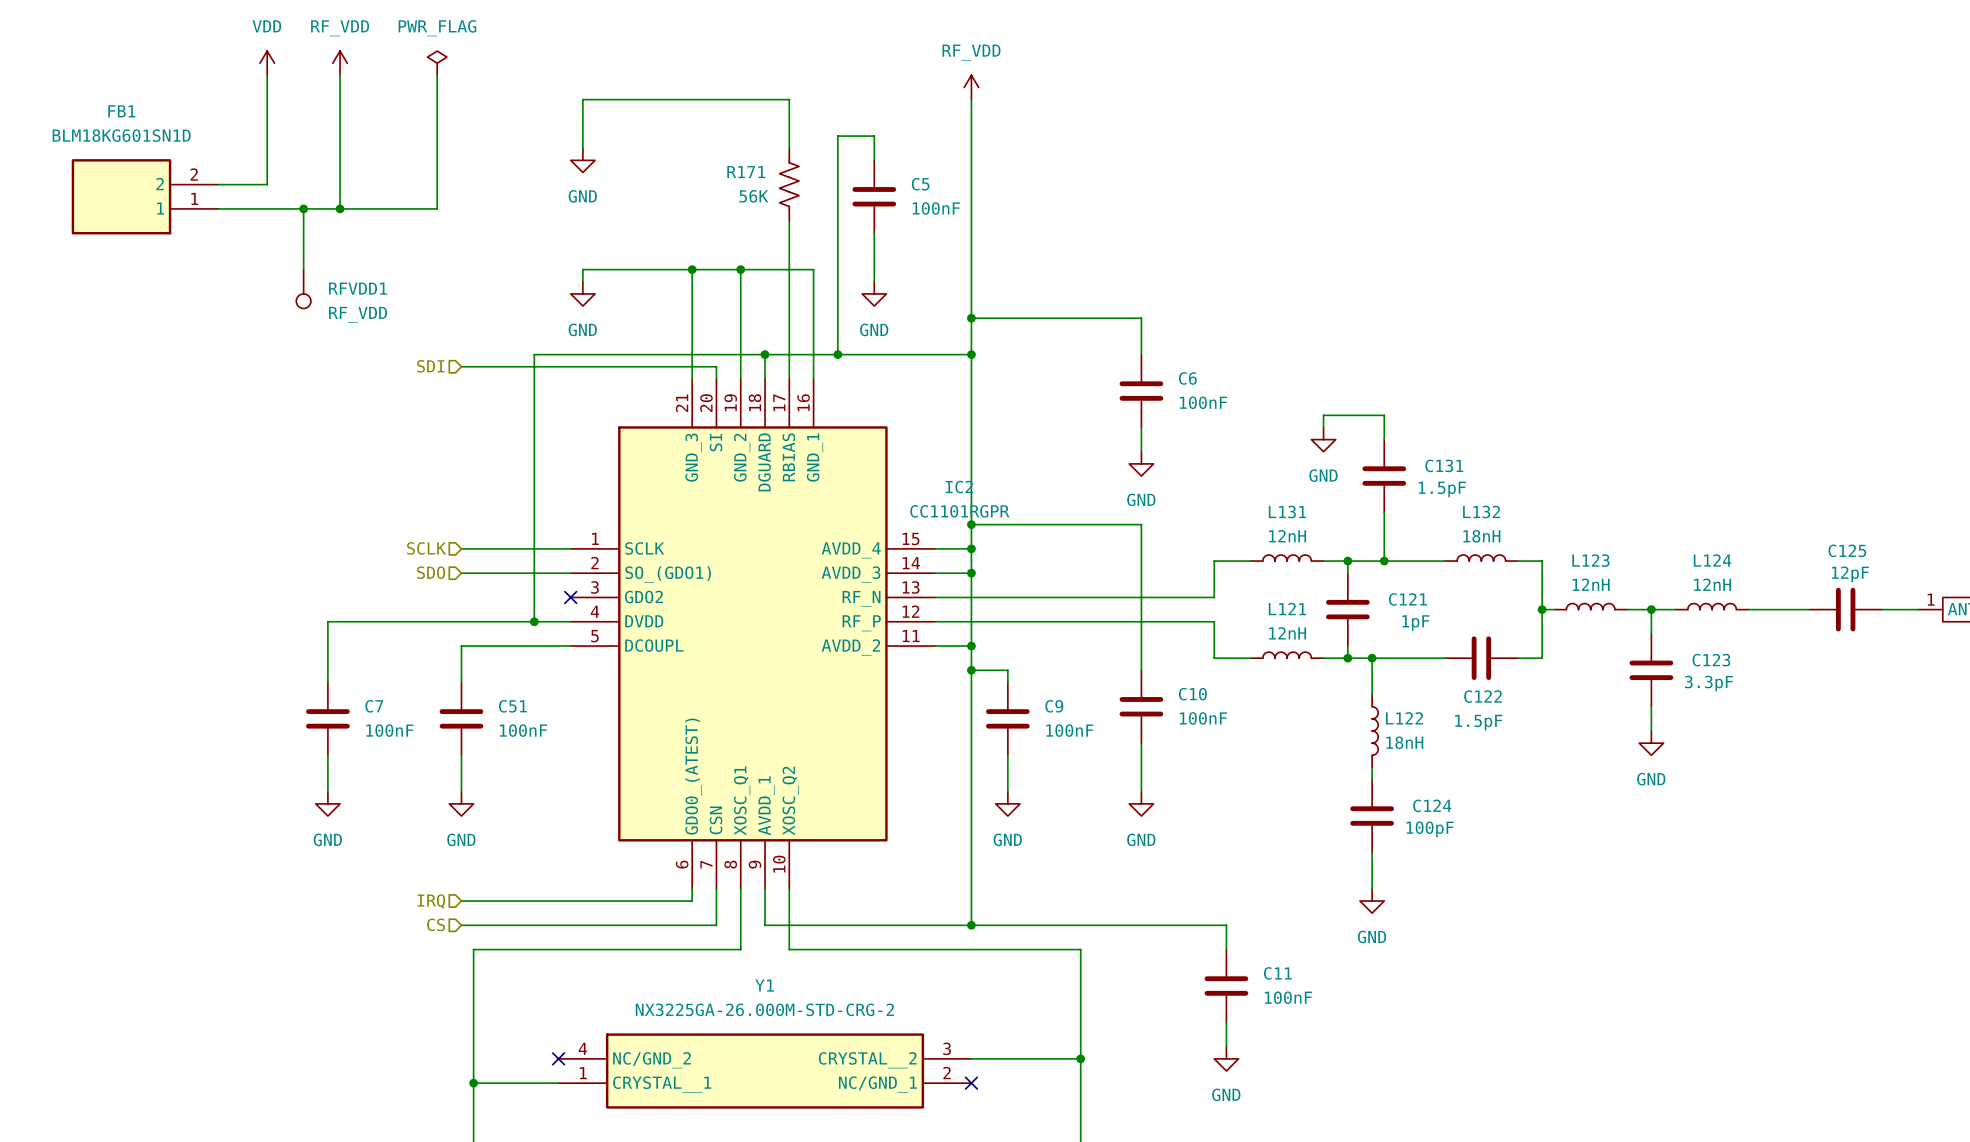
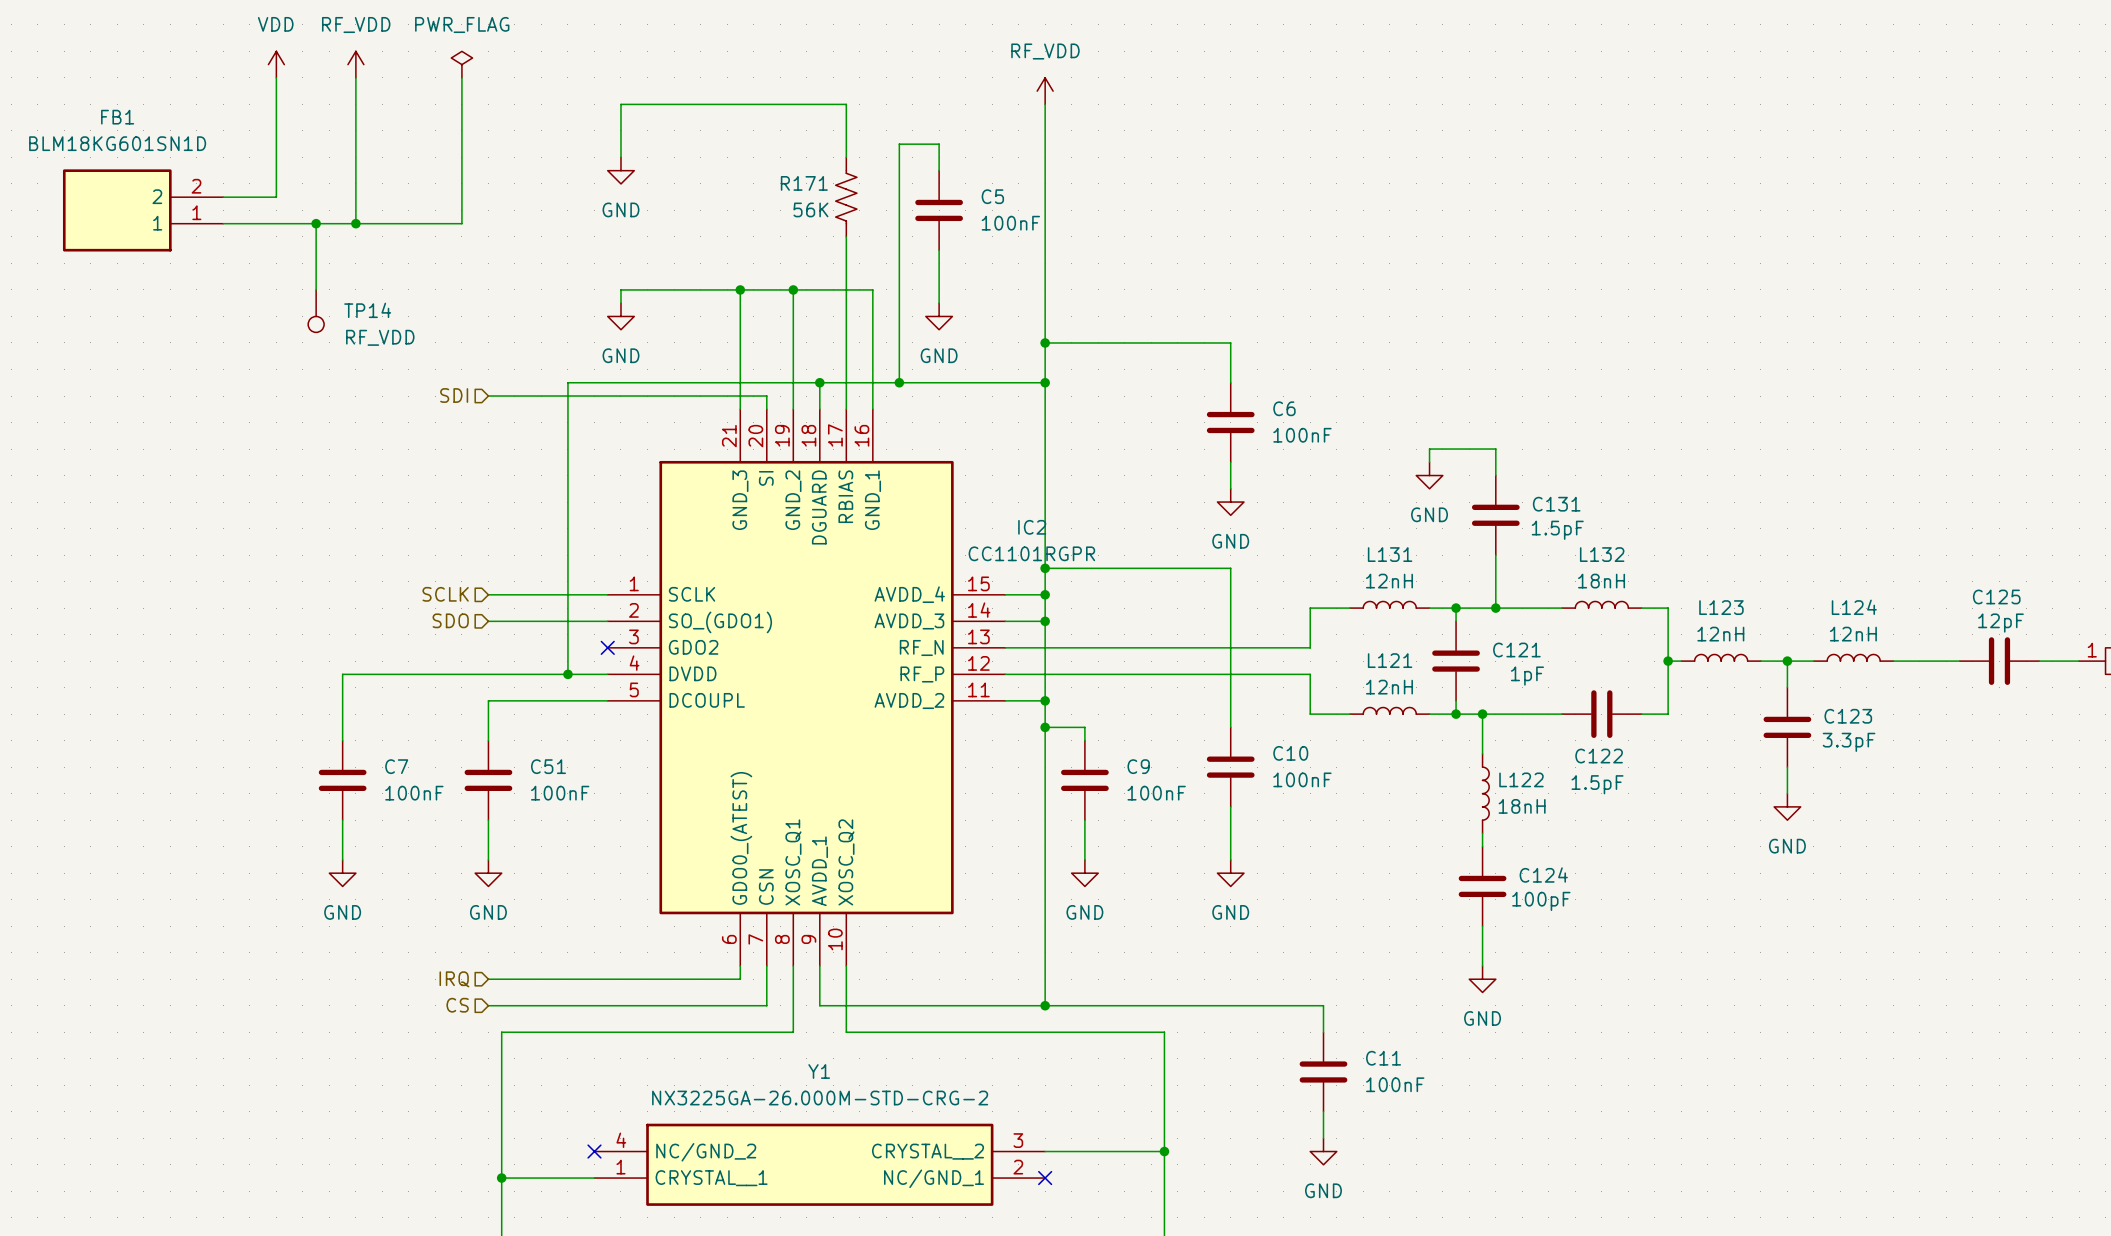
RFVDD1 name: RFVDD1 (358, 288) -> TP14 (367, 310)

